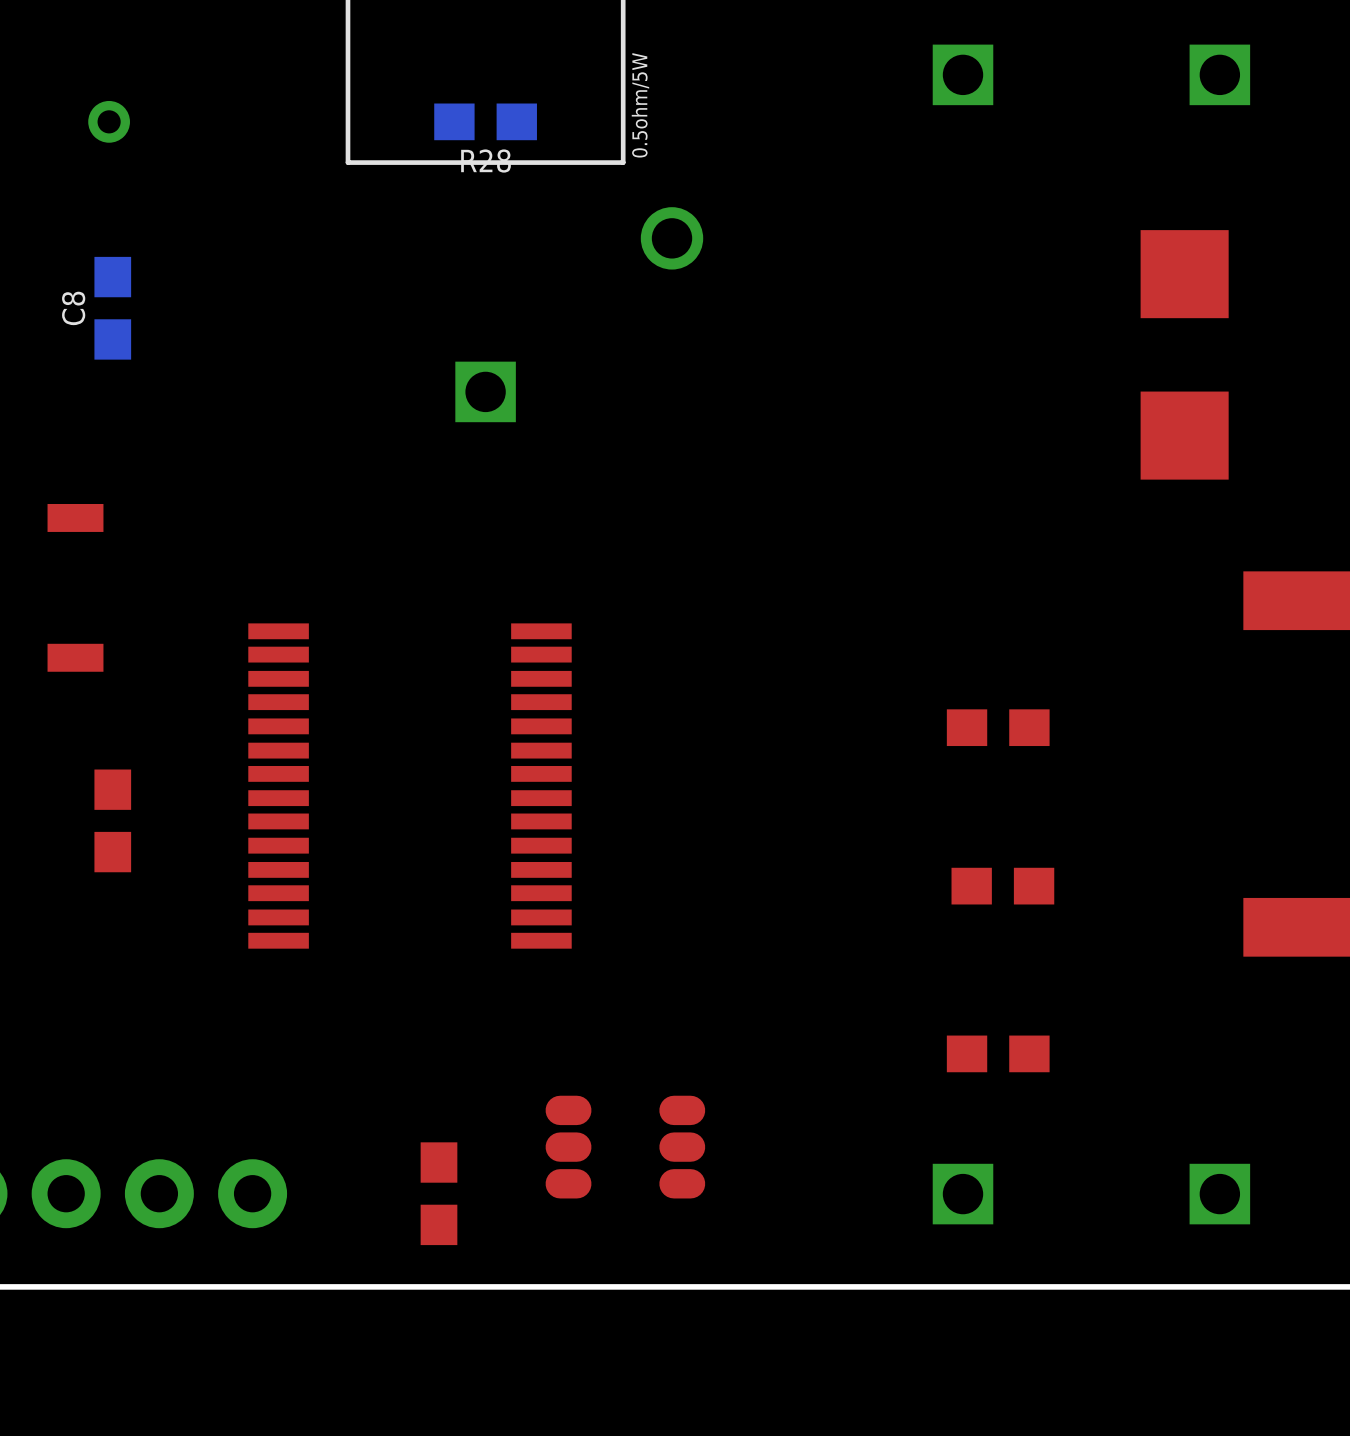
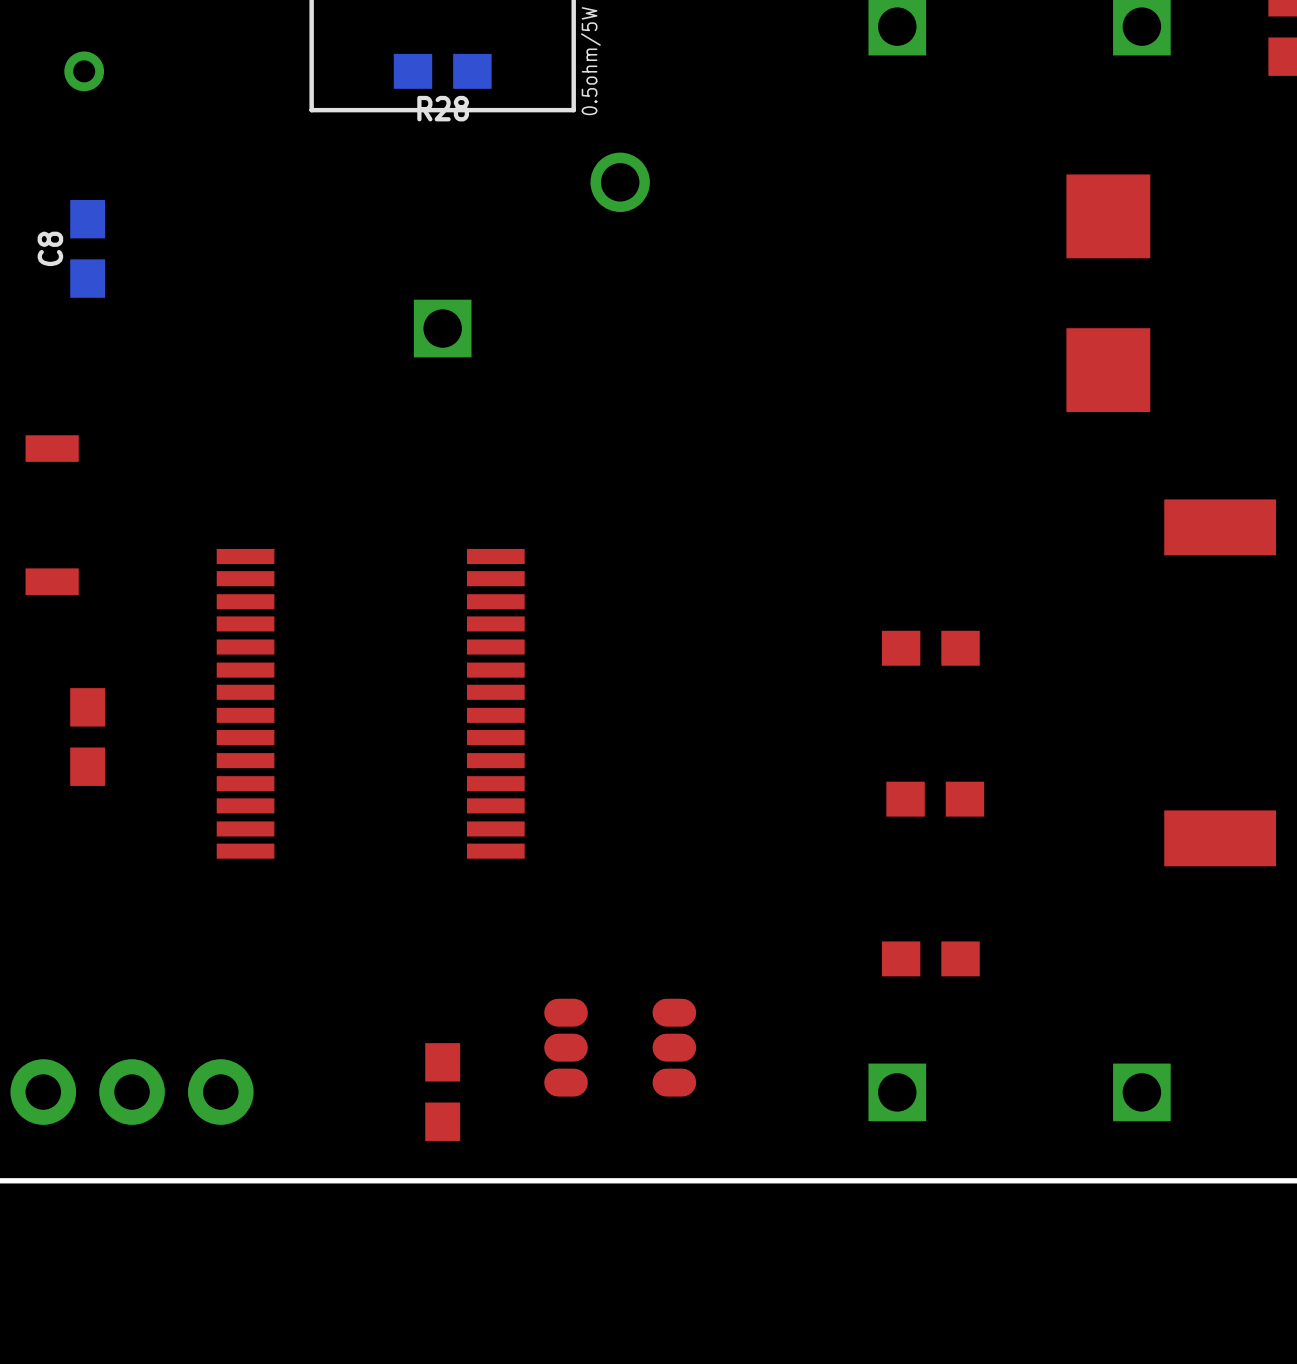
part position: (625, 1147) -> (620, 1047)
part position: (438, 1193) -> (442, 1092)

